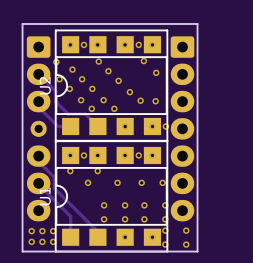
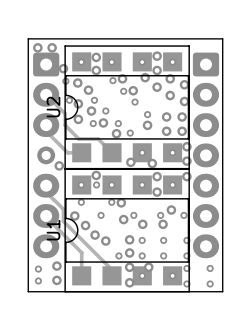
via: none -> (37, 47)
via: none -> (52, 47)
via: none -> (157, 56)
via: none -> (96, 57)
via: (84, 44) -> none
via: (138, 44) -> none
via: none -> (63, 68)
via: none -> (96, 70)
via: none -> (157, 70)
via: none -> (145, 77)
via: none -> (122, 78)
via: none -> (170, 78)
via: (143, 61) -> none
via: none -> (77, 83)
via: none -> (184, 84)
via: none -> (157, 87)
via: (72, 69) -> none
via: none -> (88, 90)
via: none -> (133, 90)
via: (156, 72) -> none
via: none -> (170, 95)
via: none -> (184, 101)
via: none -> (78, 103)
via: (69, 88) -> none
via: none -> (91, 111)
via: none -> (166, 116)
via: none -> (182, 116)
via: none -> (78, 119)
via: none -> (103, 122)
via: (140, 100) -> none
via: none -> (147, 125)
via: (155, 101) -> none
via: none -> (166, 131)
via: none -> (182, 131)
via: (91, 108) -> none
via: none -> (116, 133)
via: none -> (186, 146)
via: (165, 126) -> none
via: none -> (186, 161)
via: none -> (130, 162)
via: none -> (152, 163)
via: none -> (59, 165)
via: none -> (96, 175)
via: none -> (157, 176)
via: none -> (186, 176)
via: (138, 155) -> none
via: none -> (157, 192)
via: none -> (121, 202)
via: none -> (171, 210)
via: none -> (74, 215)
via: none -> (123, 219)
via: none -> (142, 224)
via: none -> (163, 224)
via: none -> (85, 225)
via: none -> (95, 235)
via: none -> (129, 239)
via: none -> (105, 241)
via: (104, 205) -> none
via: none -> (129, 252)
via: none -> (56, 266)
via: none -> (129, 267)
via: none -> (148, 267)
via: (42, 231) -> none
via: (53, 231) -> none
via: (42, 241) -> none
via: none -> (56, 280)
via: (53, 241) -> none
via: none -> (129, 282)

